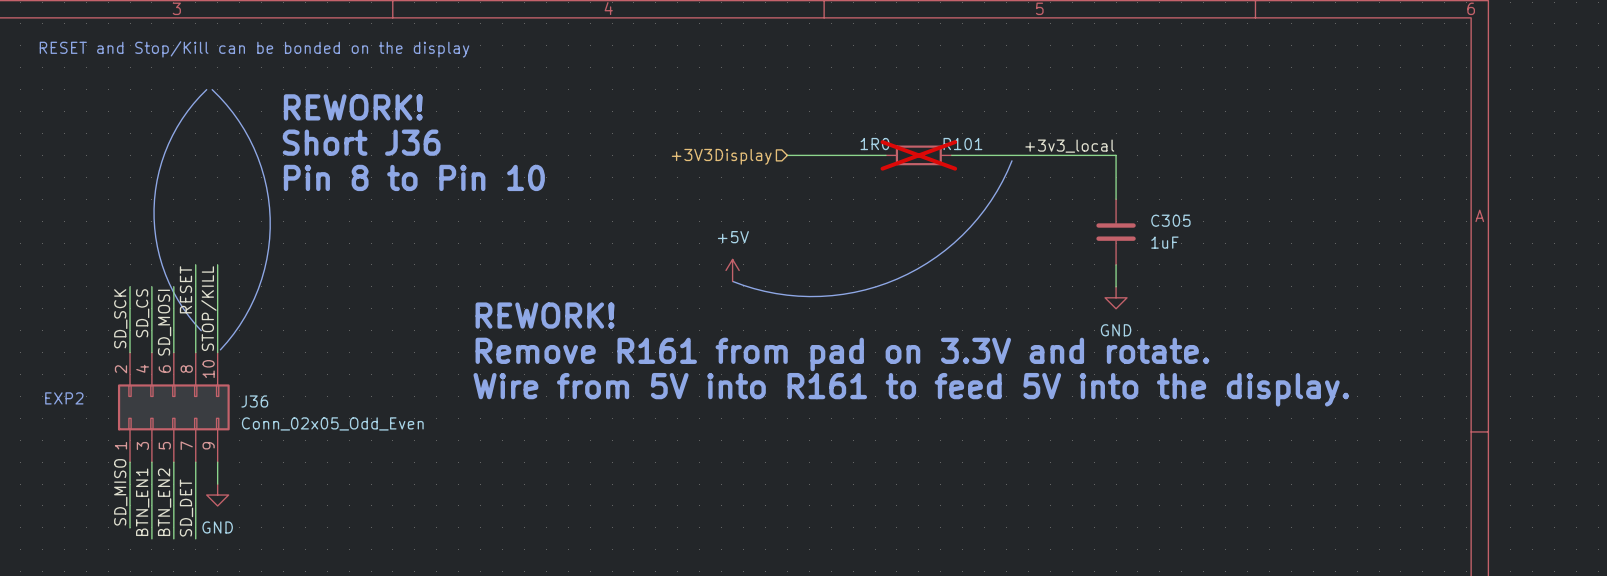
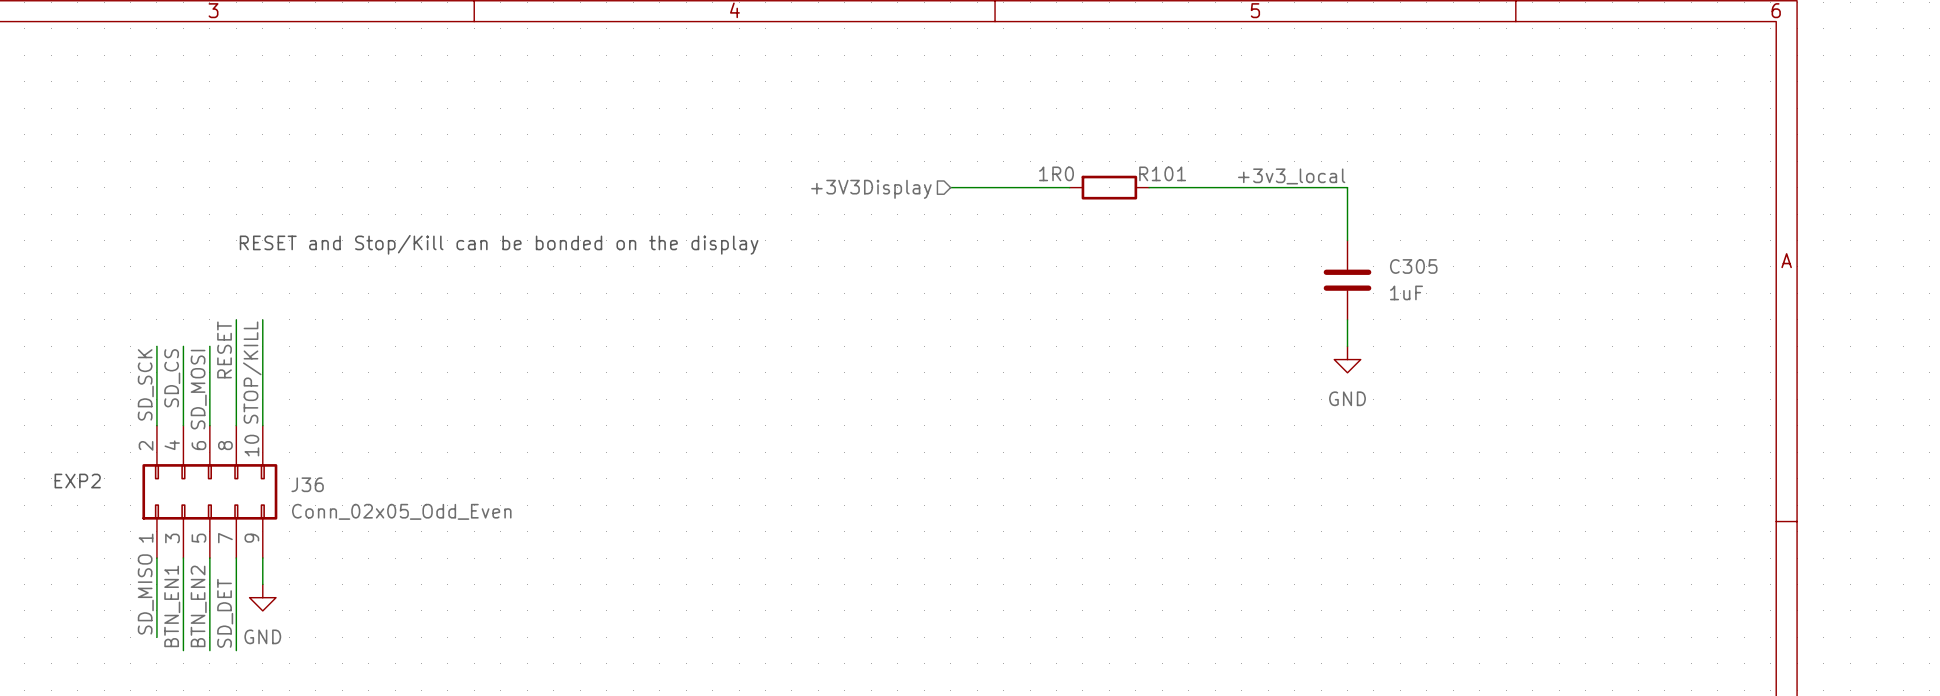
text: RESET and Stop/Kill can be bonded on the display (254, 49) -> none
line: (206, 89) (182, 118) (168, 144) (159, 171) (154, 209) (157, 247) (165, 274) (183, 308) (201, 330) -> none
line: (212, 89) (232, 112) (253, 148) (264, 177) (270, 218) (266, 259) (258, 288) (239, 325) (220, 349) -> none
text: REWORK! (353, 107) -> none
text: Short J36 (361, 142) -> none
R101 do-not-place cross: (918, 155) -> none
line: (1011, 160) (991, 200) (962, 235) (927, 263) (897, 278) (854, 292) (820, 296) (775, 293) (732, 281) -> none
text: Pin 8 to Pin 10 (414, 177) -> none
text: none -> RESET and Stop/Kill can be bonded on the display (499, 244)
power symbol: +5V (732, 270) -> none
text: REWORK! (545, 315) -> none
text: Remove R161 from pad on 3.3V and rotate. (842, 354) -> none
text: Wire from 5V into R161 to feed 5V into the display. (911, 389) -> none

